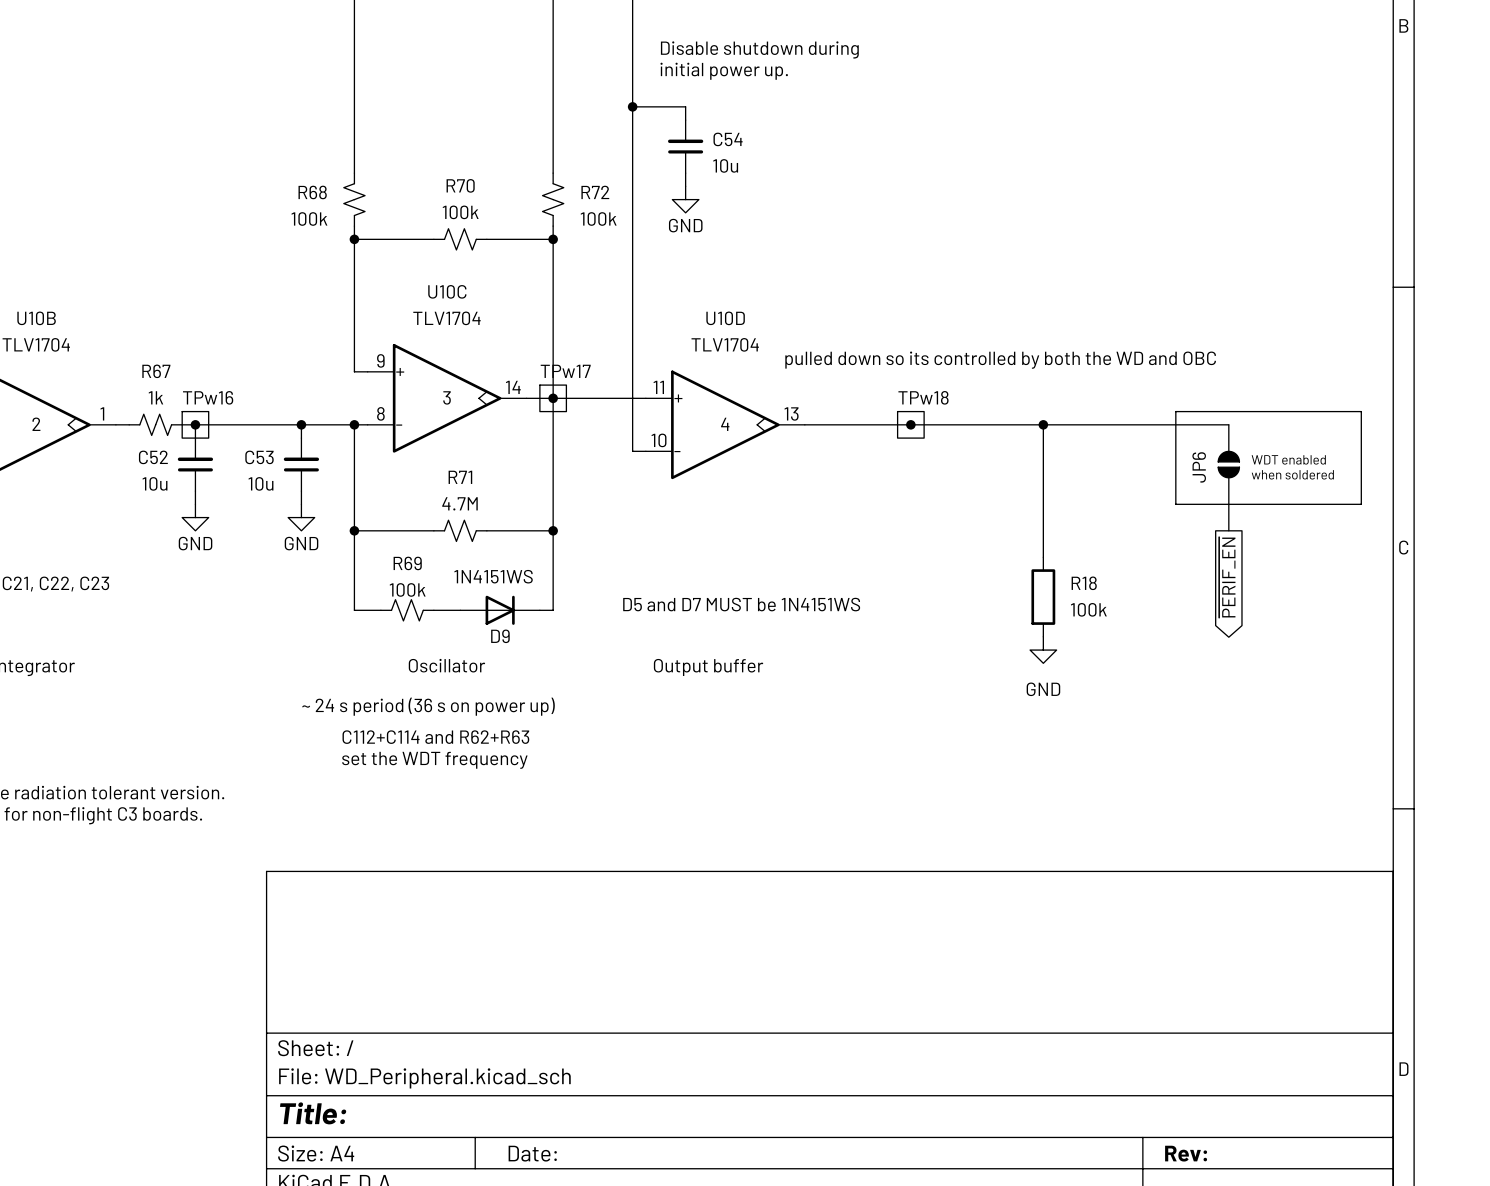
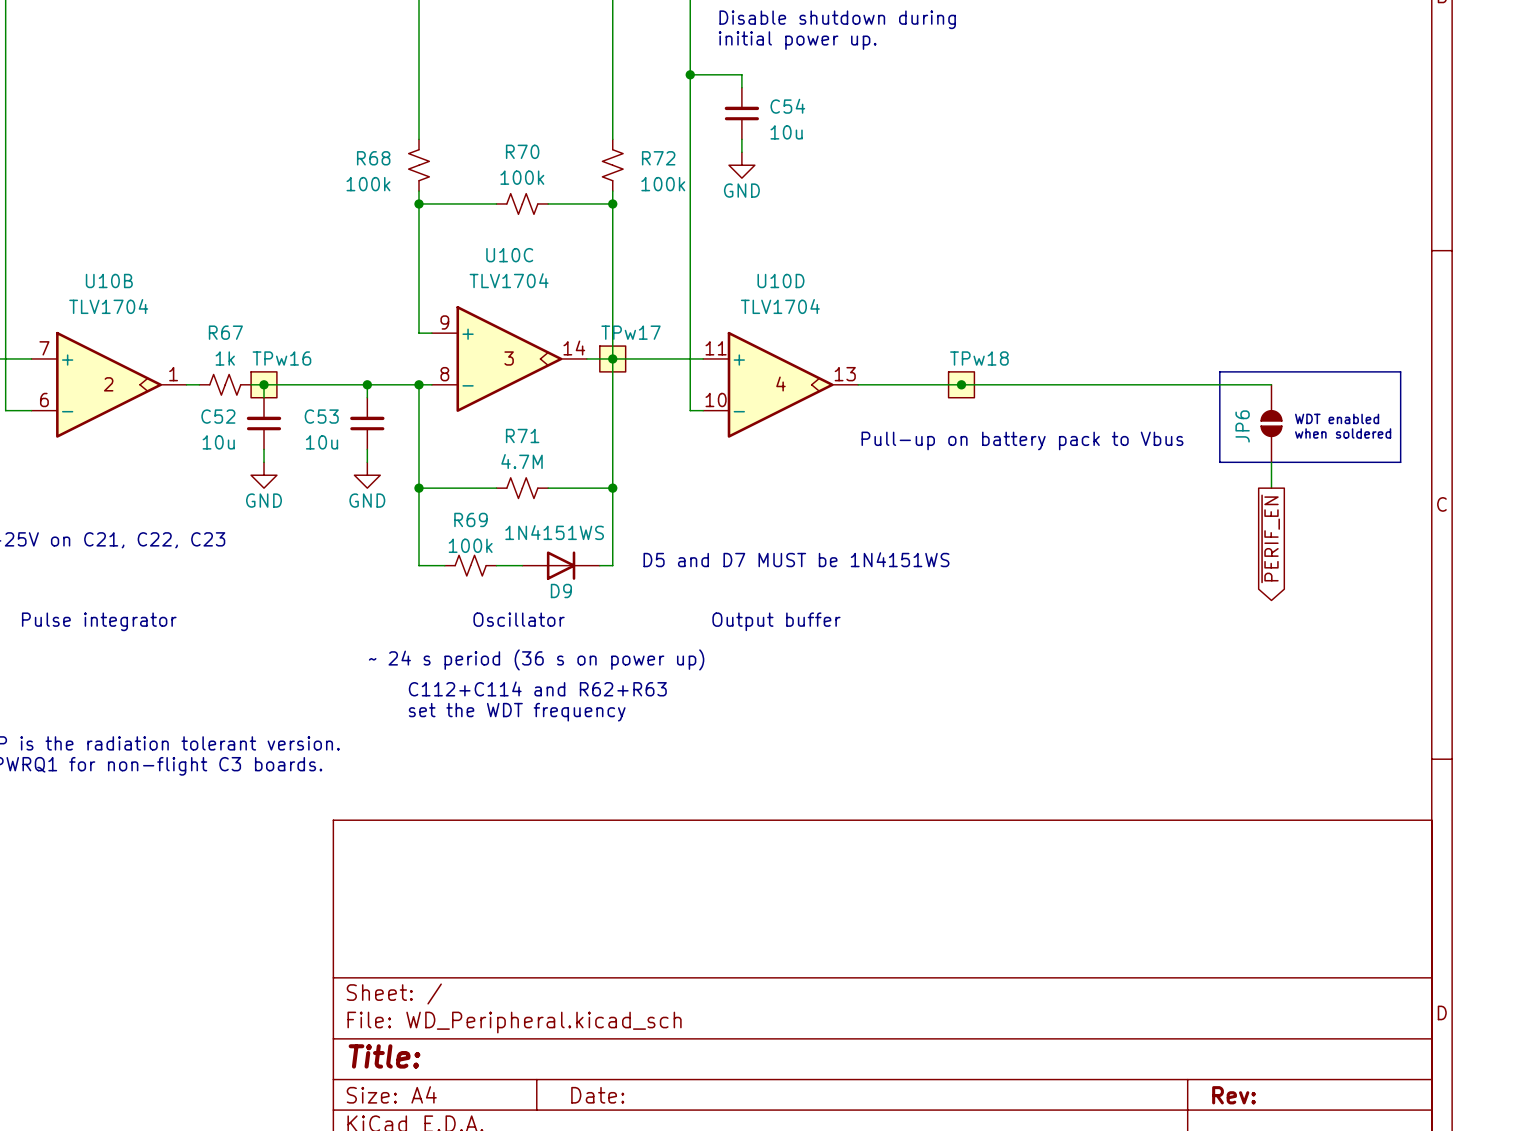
text: pulled down so its controlled by both the WD and OBC (1000, 360) -> none
wire: (1043, 424) (1043, 557) -> none
junction: (1043, 424) -> none
text: none -> Pull-up on battery pack to Vbus (1022, 440)
R18: 100k (1043, 597) -> none
power symbol: GND (1043, 650) -> none

